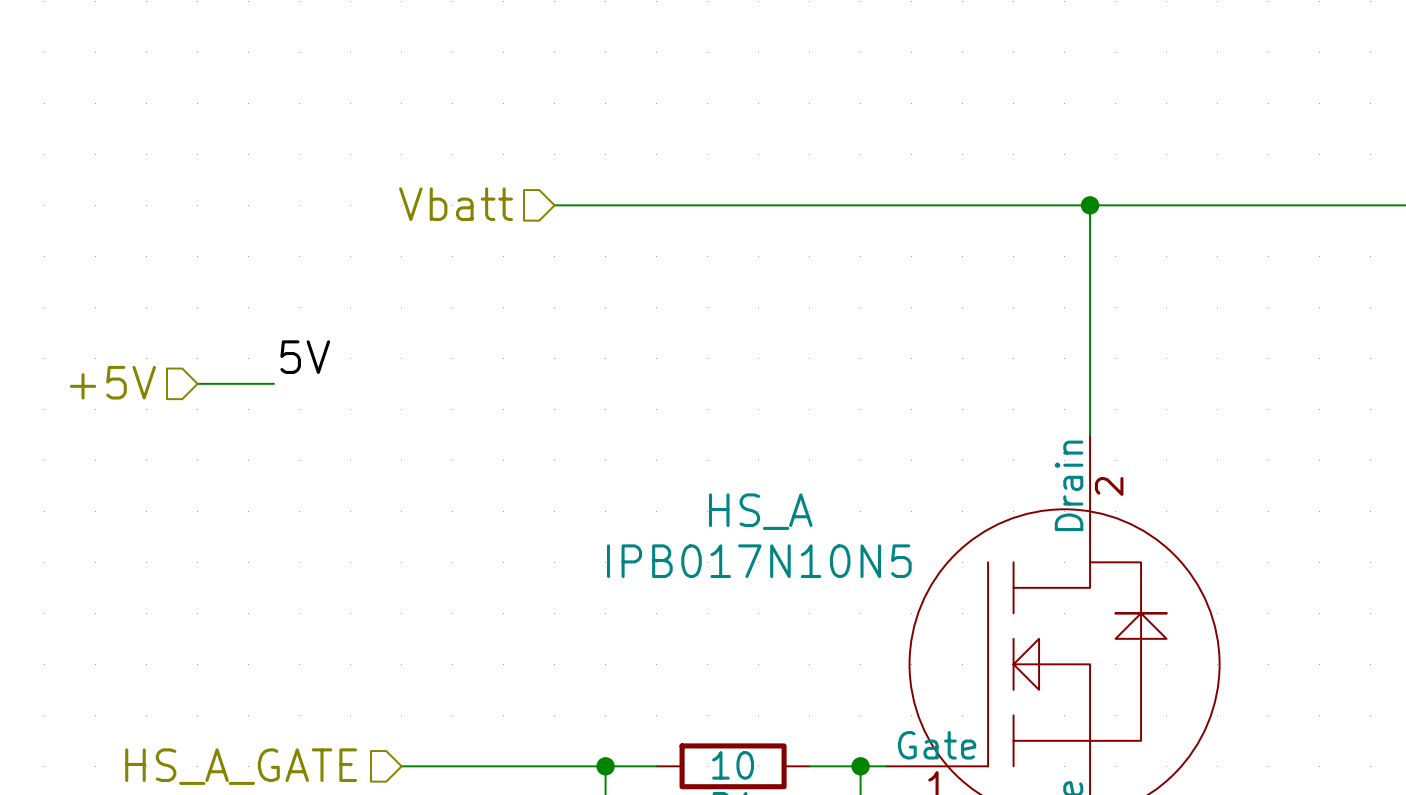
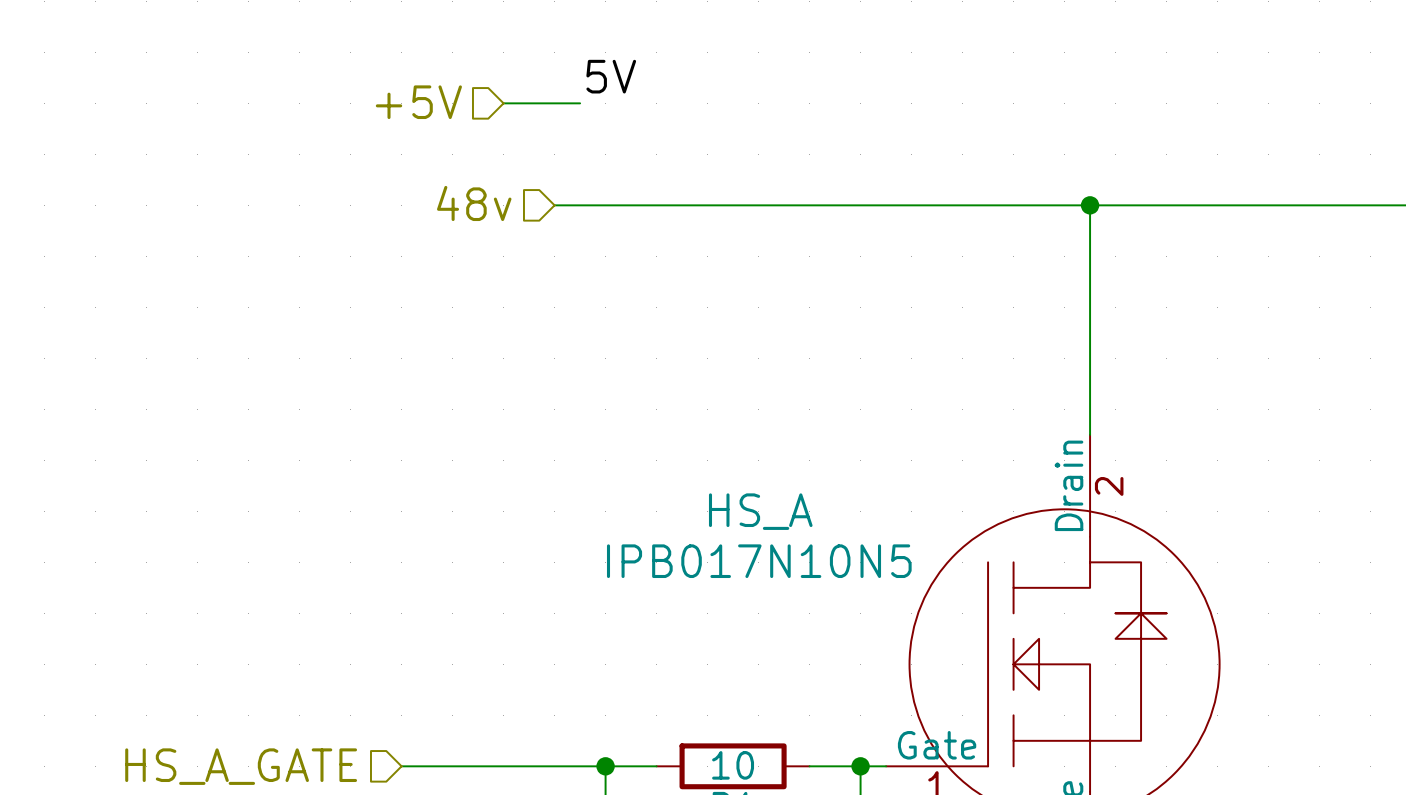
hierarchical label: Vbatt (456, 204) -> 48v (474, 203)
label position: 5V (305, 357) -> 5V (611, 76)
hierarchical label position: +5V (112, 382) -> +5V (418, 102)
wire: (197, 383) (274, 383) -> (503, 103) (580, 103)

